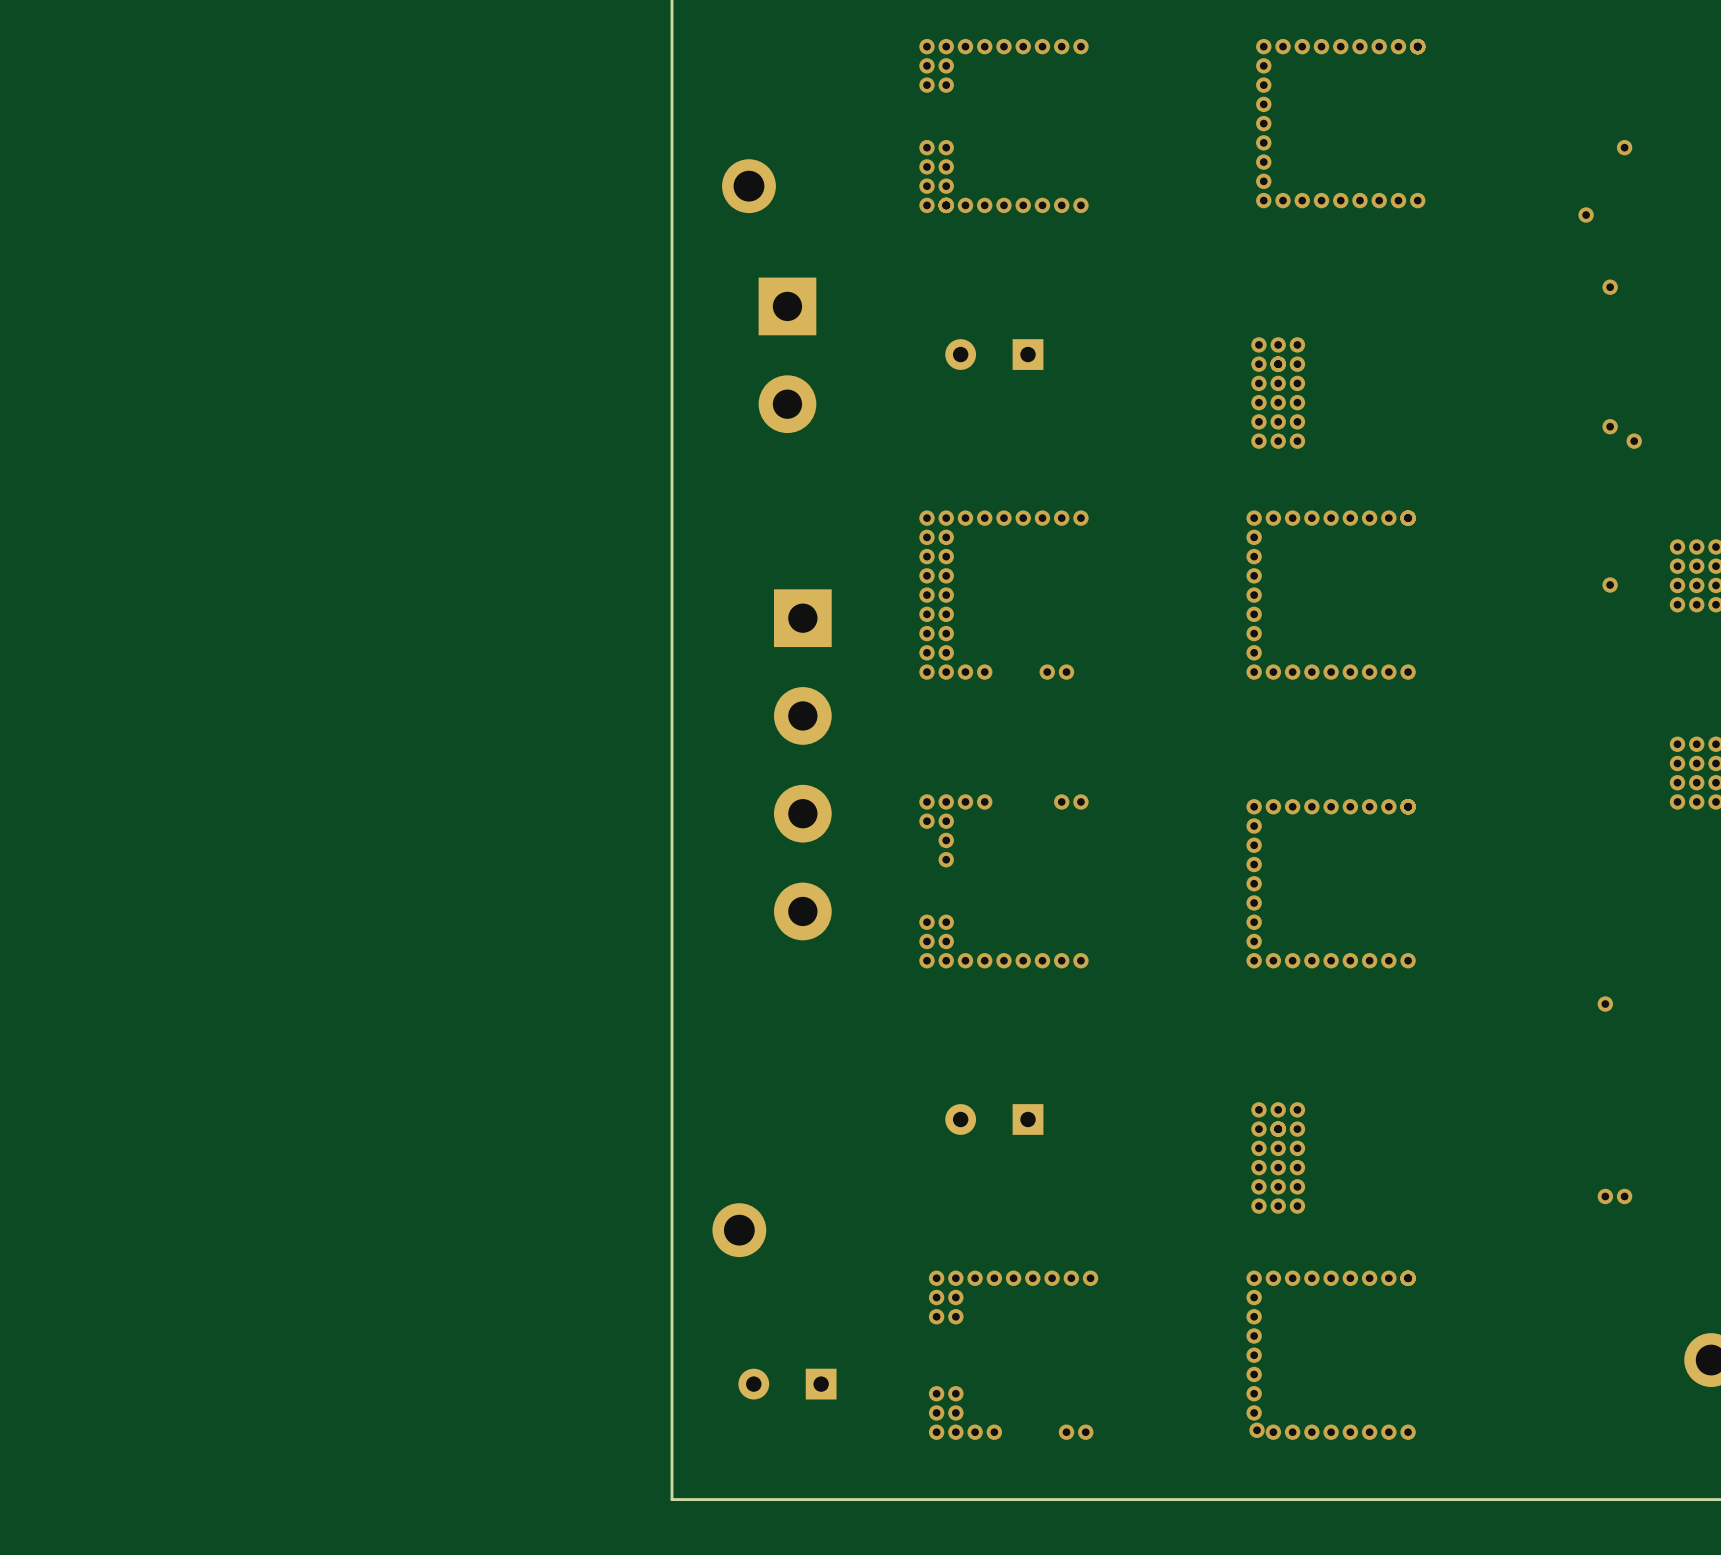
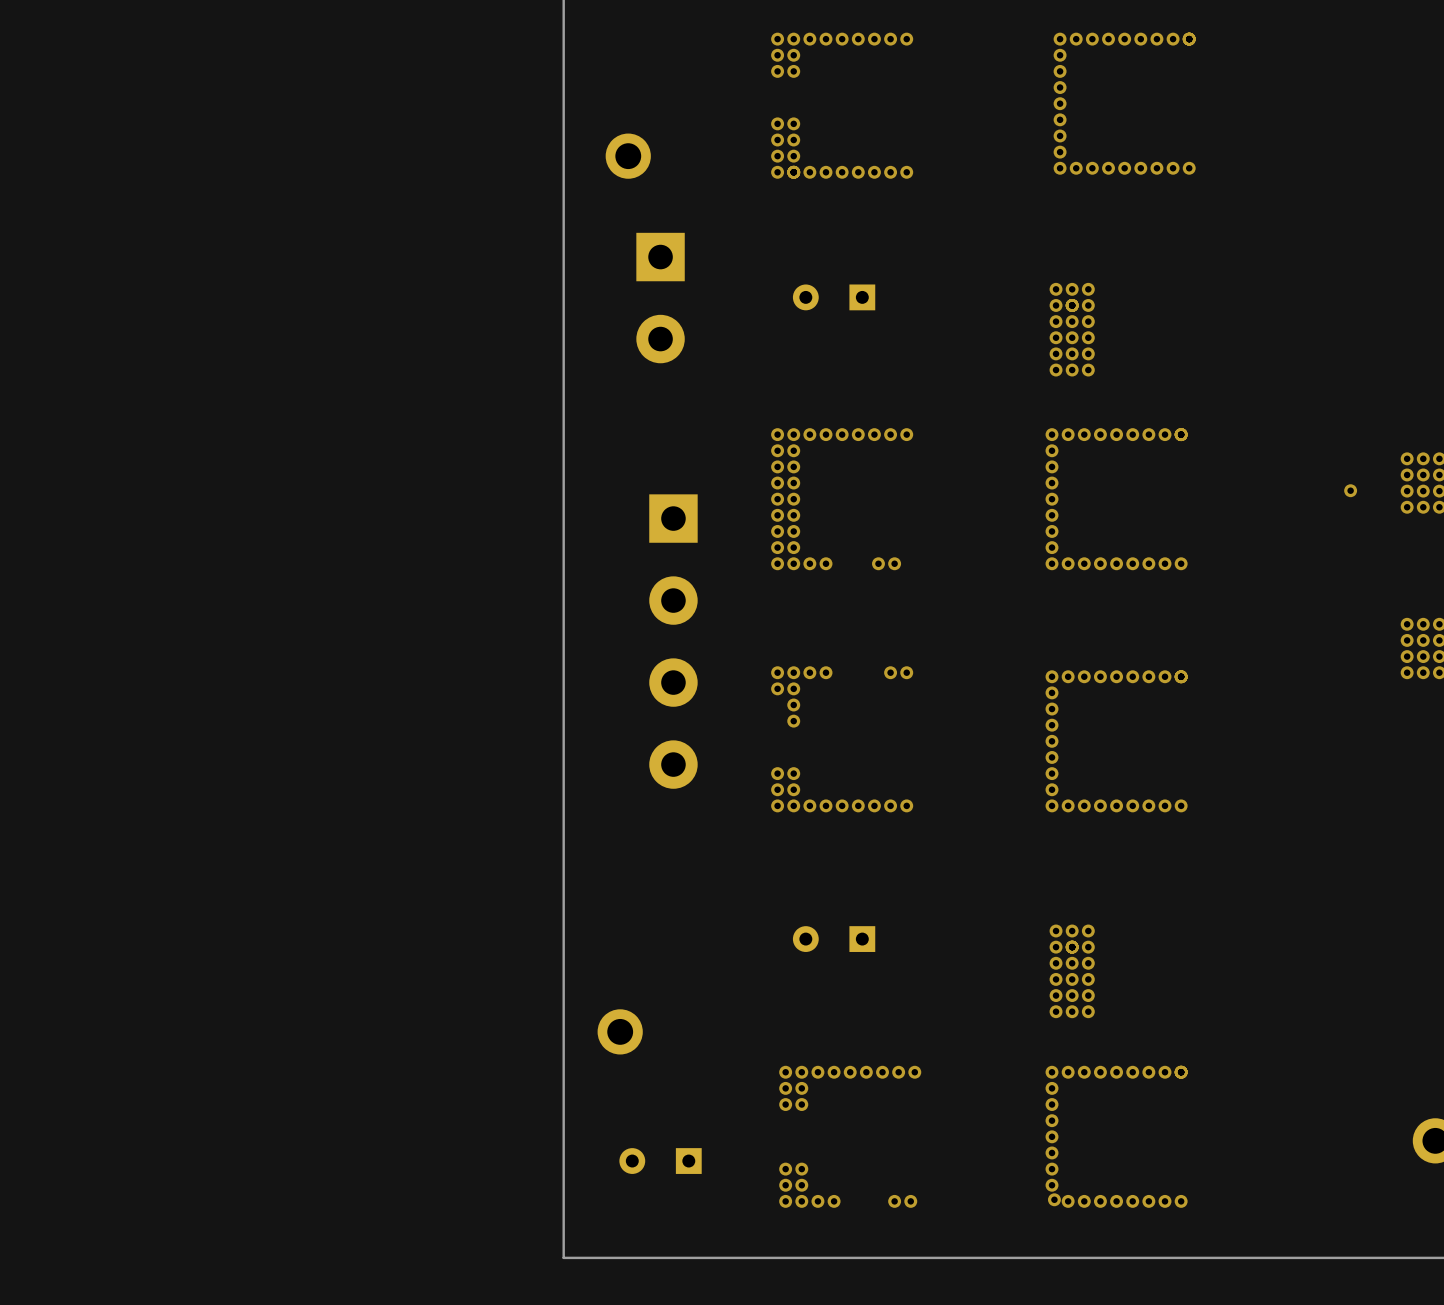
via: (1624, 147) -> none
via: (1586, 215) -> none
via: (1610, 287) -> none
via: (1610, 426) -> none
via: (1634, 441) -> none
via: (1605, 1004) -> none
via: (1605, 1196) -> none
via: (1624, 1196) -> none

